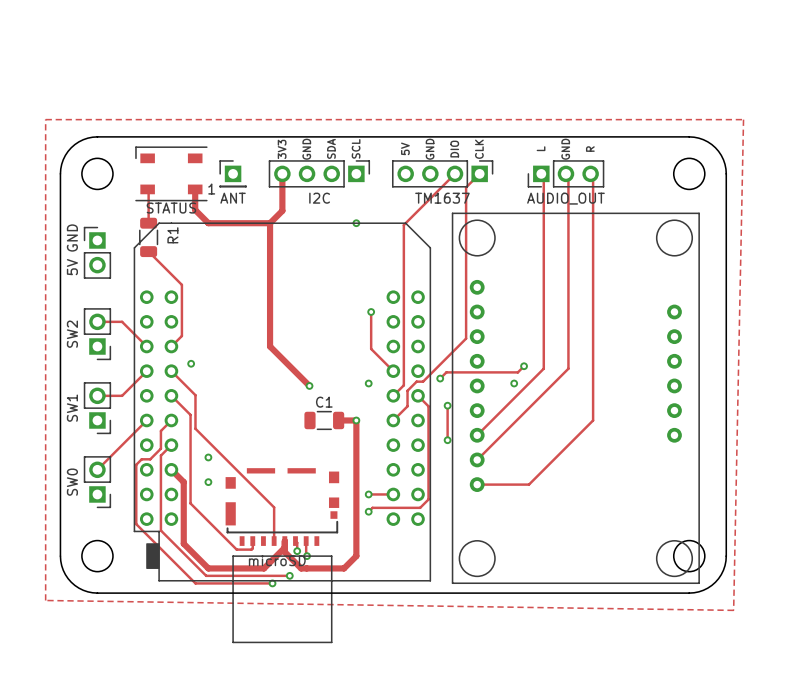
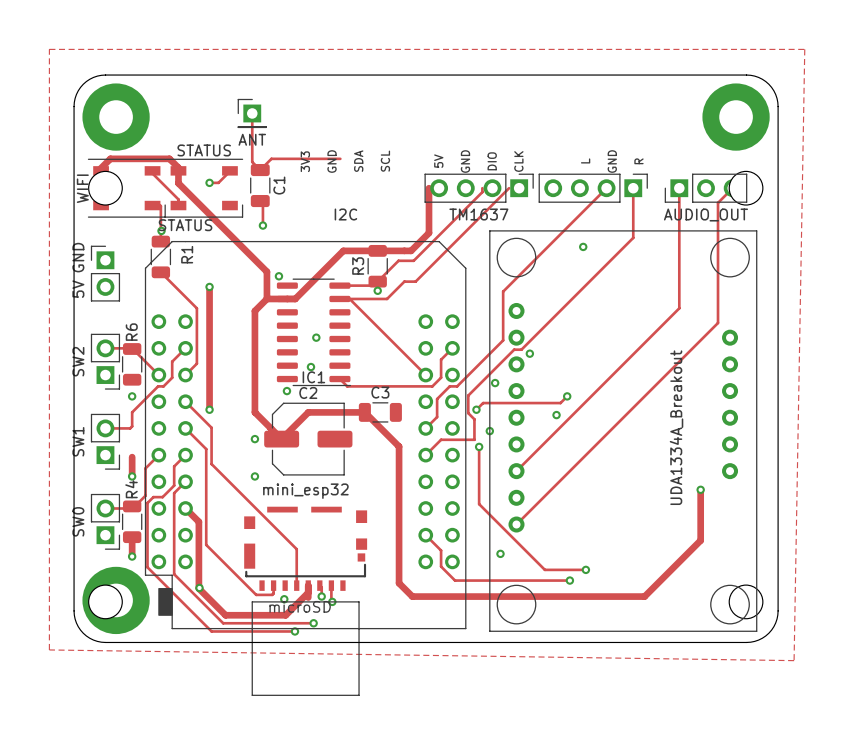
track: none -> (252, 113) (252, 162) (260, 170) (271, 158) (340, 158)
part: none -> (116, 117)
part: none -> (736, 117)
zone outline: (45, 119) (743, 119) (733, 610) -> (49, 129) (49, 49) (804, 49) (794, 660)
board edge: (97, 136) (689, 136) (698, 138) (711, 144) (723, 159) (726, 173) (726, 556) (723, 570) (718, 578) (703, 590) (689, 593) (97, 593) (83, 590) (74, 585) (65, 574) (60, 556) (60, 173) (63, 159) (71, 147) (83, 139) (97, 136) -> (105, 75) (93, 77) (83, 84) (76, 94) (74, 106) (74, 610) (78, 626) (86, 635) (97, 641) (105, 642) (746, 642) (758, 640) (771, 630) (775, 623) (778, 610) (778, 106) (773, 90) (765, 81) (758, 77) (746, 75) (105, 75)
track: none -> (98, 170) (110, 158) (169, 158) (178, 167) (178, 183) (266, 271) (266, 298)
track: none -> (149, 170) (178, 199) (179, 206)
track: none -> (229, 171) (218, 182) (209, 182)
via: none -> (209, 182)
part: none -> (126, 188)
part: (171, 173) -> none
part: none -> (204, 188)
part position: (233, 173) -> (252, 113)
track: (282, 173) (282, 210) (270, 223) -> none
part position: (319, 173) -> (593, 188)
track: none -> (429, 188) (429, 233) (411, 250) (343, 250) (295, 298) (266, 298)
track: none -> (482, 188) (482, 192) (413, 260) (398, 260) (373, 285) (339, 285)
track: (455, 173) (403, 225) (403, 368) -> (606, 188) (503, 291) (503, 340) (457, 386) (449, 386) (437, 399)
track: none -> (509, 188) (415, 281) (404, 281) (387, 298) (339, 298)
track: (479, 173) (466, 187) (466, 338) (423, 381) (416, 381) (407, 390) (407, 406) -> (633, 188) (633, 237) (521, 349) (514, 349) (468, 395) (468, 413) (474, 419) (474, 439) (441, 439)
track: (543, 173) (543, 368) -> (679, 188) (679, 308) (588, 399)
part position: (565, 173) -> (706, 188)
track: (568, 173) (568, 368) (477, 459) -> none
track: (593, 173) (593, 420) (528, 484) (477, 484) -> (732, 188) (718, 202) (718, 322) (516, 524)
track: none -> (260, 201) (262, 203) (262, 225)
track: (195, 189) (195, 210) (208, 223) (270, 223) -> none
text position: AUDIO_OUT (565, 198) -> AUDIO_OUT (706, 215)
via: none -> (262, 225)
via: none -> (161, 230)
track: (270, 223) (270, 346) (309, 385) -> none
via: (356, 223) -> none
via: none -> (583, 246)
R3: none -> (377, 266)
via: none -> (278, 276)
track: none -> (209, 286) (209, 409)
via: none -> (209, 286)
via: none -> (377, 290)
track: none -> (266, 298) (254, 310) (254, 412) (281, 439) (308, 412) (364, 412) (399, 446) (399, 583) (412, 596) (644, 596) (700, 540) (700, 489)
track: none -> (349, 298) (425, 375)
IC1: none -> (313, 332)
via: none -> (316, 337)
track: (371, 311) (371, 348) (393, 371) -> none
via: (371, 311) -> none
track: none -> (452, 348) (441, 359) (441, 377) (432, 386) (347, 386) (339, 379)
via: none -> (529, 353)
R6: none -> (132, 364)
via: none -> (310, 367)
via: none -> (495, 383)
via: none -> (286, 391)
via position: (191, 363) -> (209, 409)
via: none -> (132, 396)
track: (146, 371) (120, 395) -> (185, 348) (172, 361) (172, 377) (163, 386) (158, 386) (132, 412) (132, 426) (130, 428)
C3: none -> (380, 412)
via: (368, 383) -> none
via: (309, 385) -> none
track: (418, 395) (428, 406) (428, 499) (420, 507) (372, 507) (368, 511) -> none
part value: none -> UDA1334A_Breakout (676, 427)
via: none -> (489, 431)
via: none -> (254, 439)
C2: none -> (308, 439)
track: (447, 405) (447, 440) -> none
via: (447, 405) -> none
track: none -> (479, 446) (479, 504) (544, 569) (585, 569)
via: none -> (479, 446)
C1 rotation: 0° (324, 420) -> 90° clockwise (260, 185)
C1 position: (324, 420) -> (260, 185)
track: (338, 420) (356, 420) (356, 556) (344, 568) (301, 568) (284, 552) -> none
via: (356, 420) -> none
track: none -> (132, 457) (132, 476)
track: (134, 432) (97, 469) -> (145, 468) (145, 495) (132, 508) (100, 508)
via: none -> (132, 476)
via: none -> (254, 476)
via: (447, 440) -> none
via: none -> (700, 489)
part value: none -> mini_esp32 (305, 491)
via: (208, 457) -> none
R4: none -> (132, 521)
via: (208, 482) -> none
track: (368, 494) (393, 494) -> (569, 580) (455, 580) (441, 566) (441, 550) (425, 535)
via: (368, 494) -> none
track: none -> (132, 537) (132, 556)
via: (368, 511) -> none
via: none -> (500, 553)
via: none -> (132, 556)
via: none -> (585, 569)
via: none -> (569, 580)
via: none -> (199, 587)
via: none -> (284, 599)
part: none -> (116, 600)

